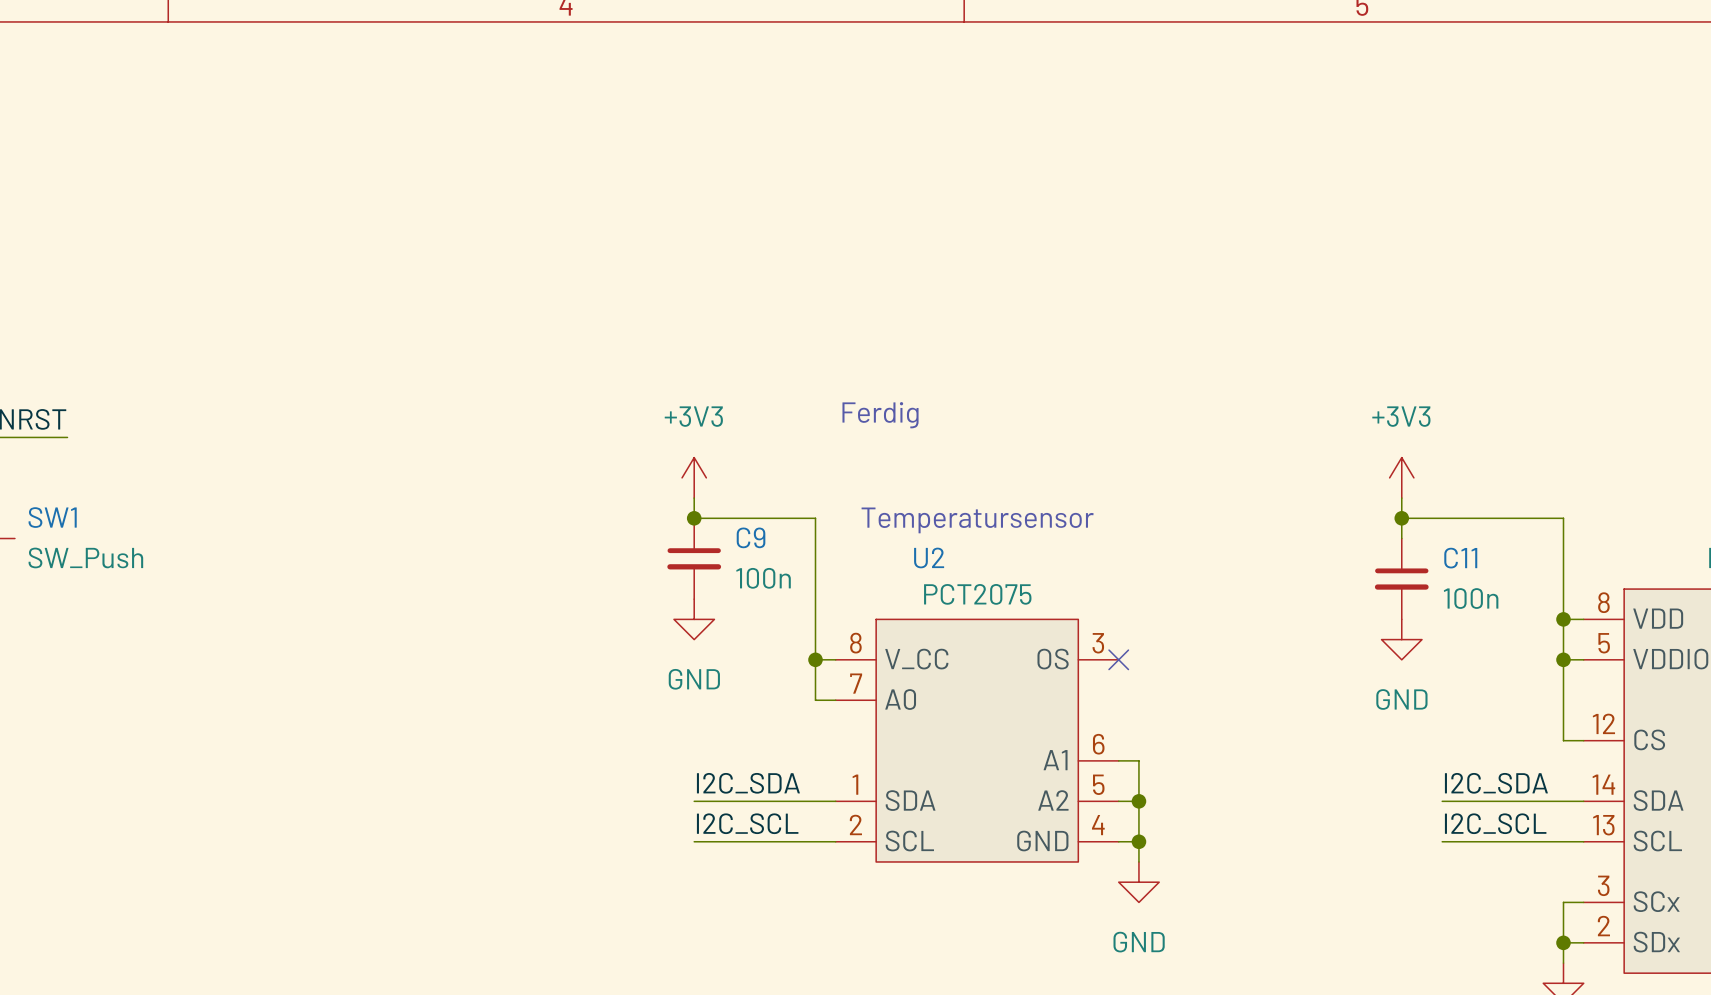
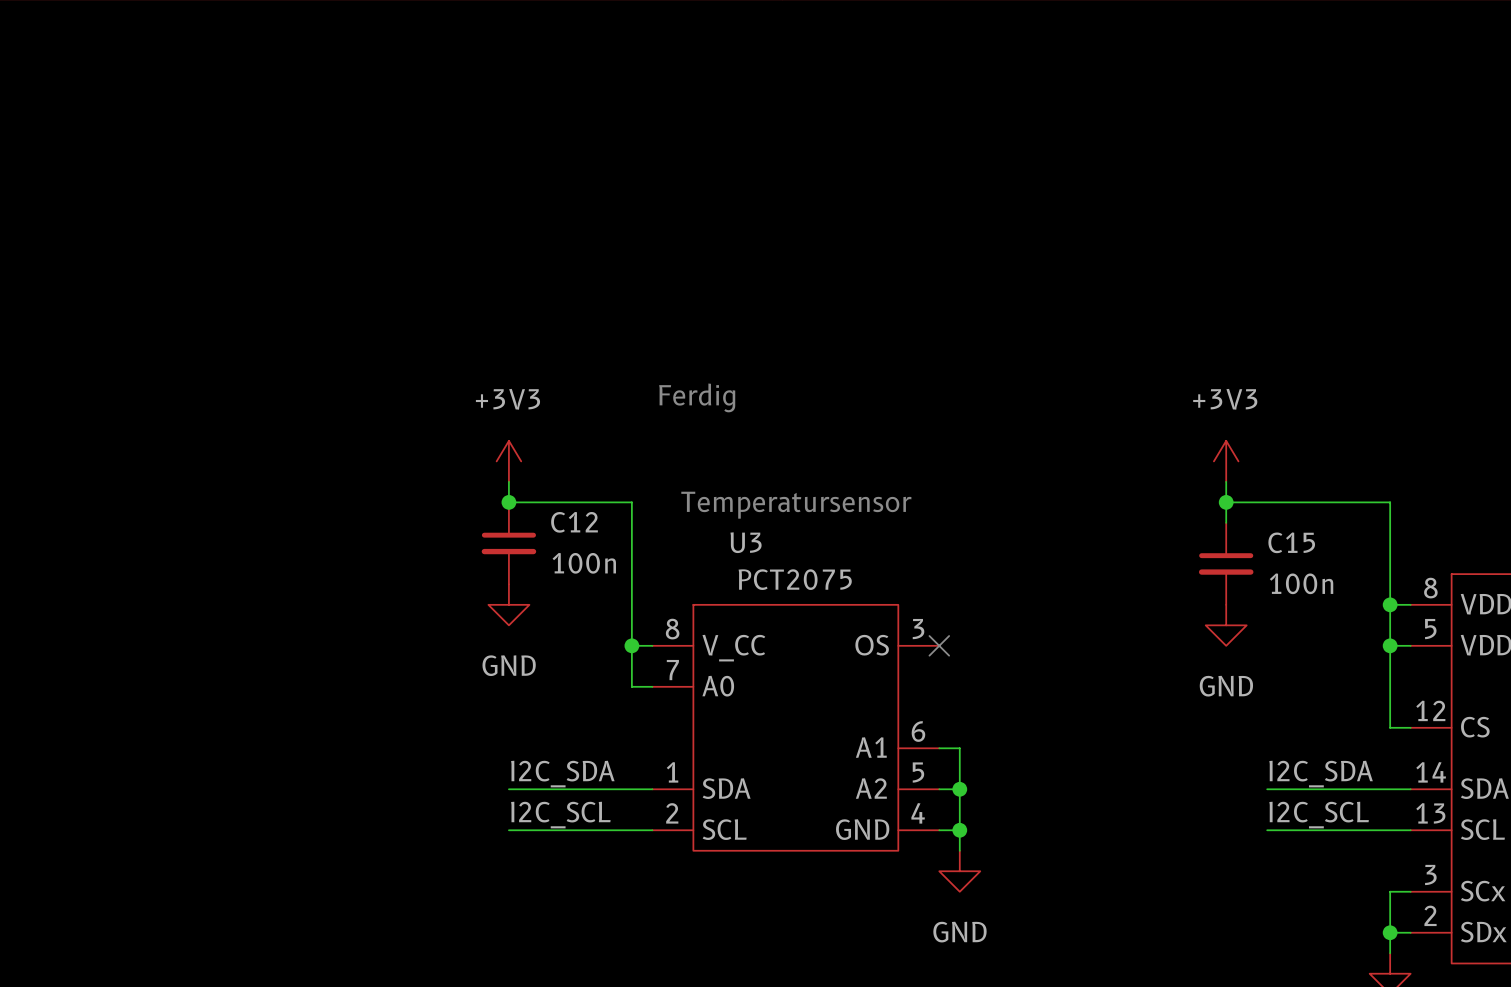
C9 name: C9 (751, 537) -> C12 (574, 522)
U2 name: U2 (929, 557) -> U3 (746, 542)
C11 name: C11 (1460, 558) -> C15 (1291, 542)

